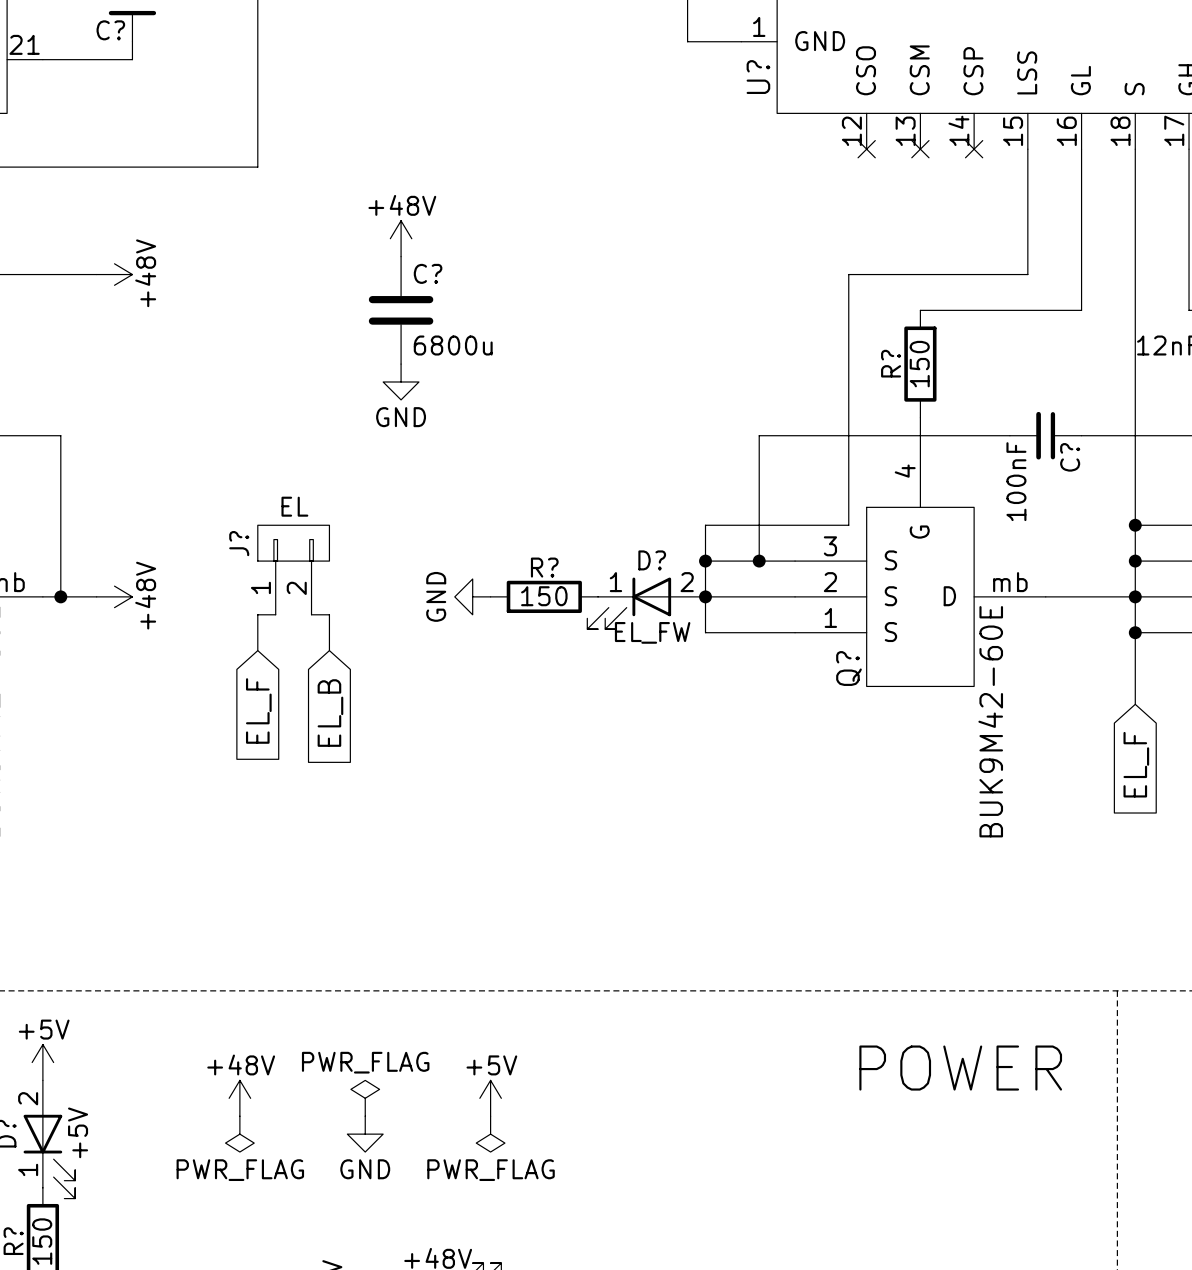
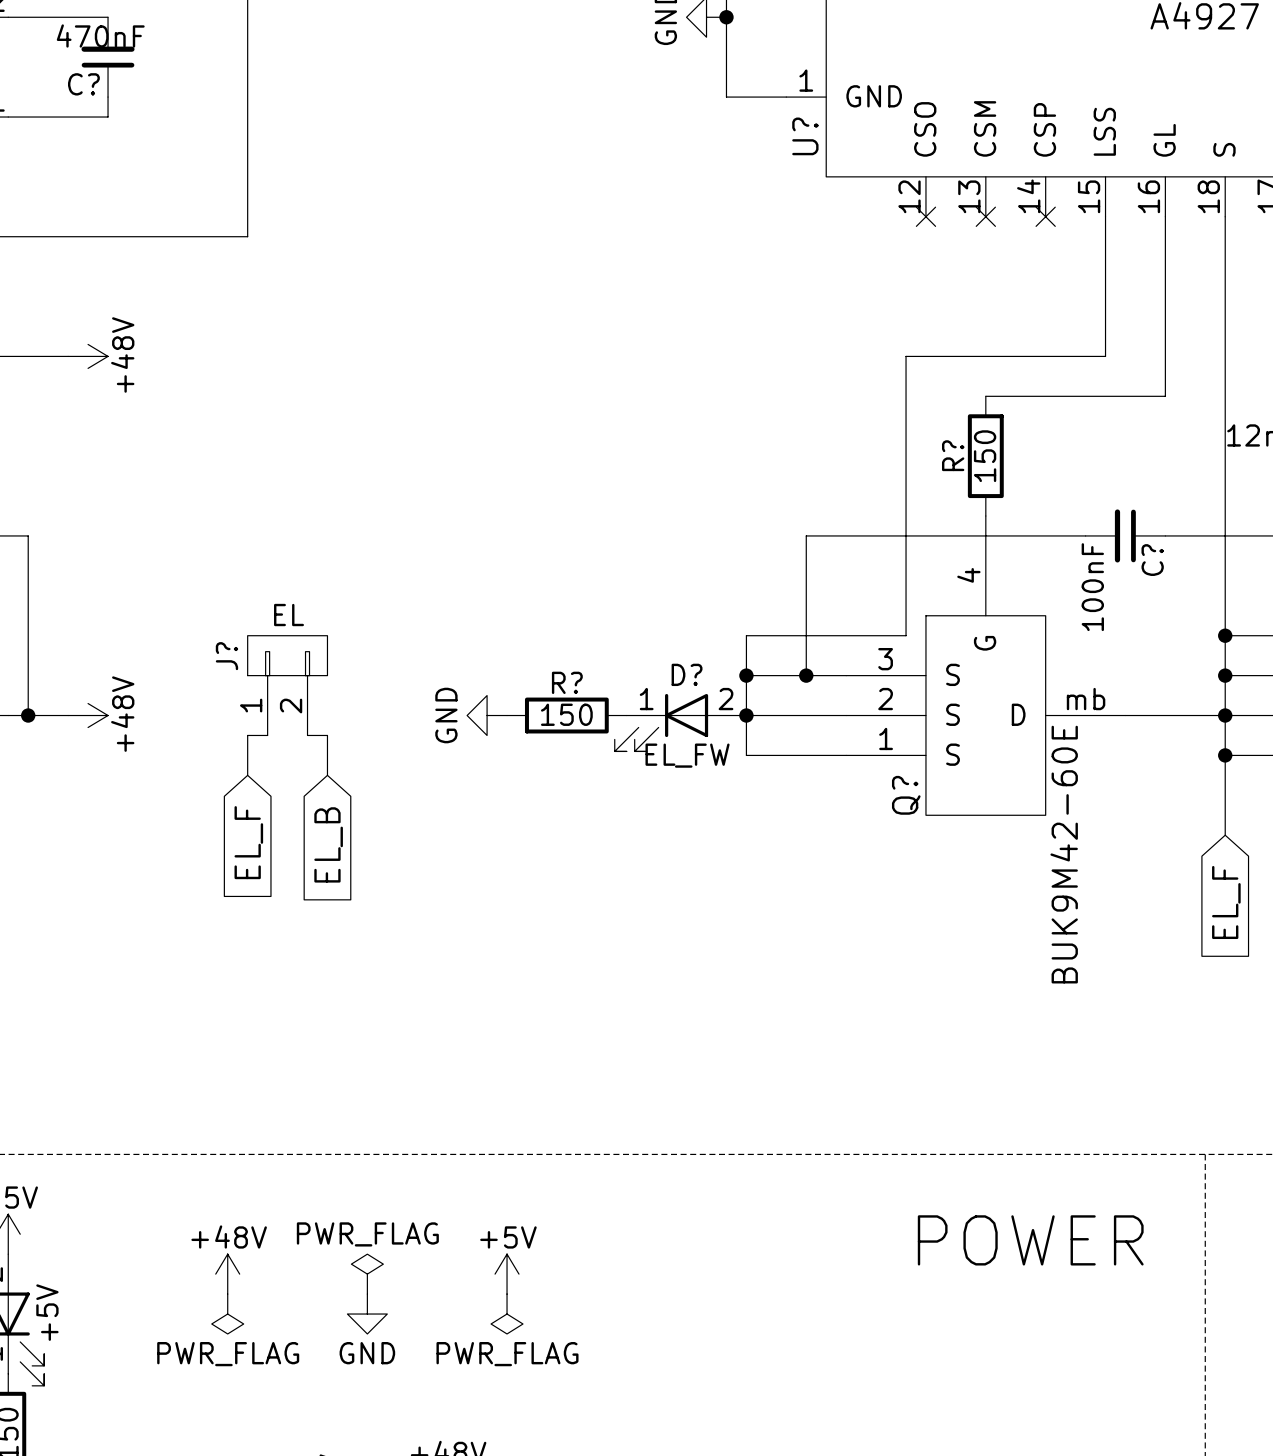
power symbol: +48V (401, 238) -> none
C?: 6800u (401, 310) -> none
power symbol: GND (401, 381) -> none

